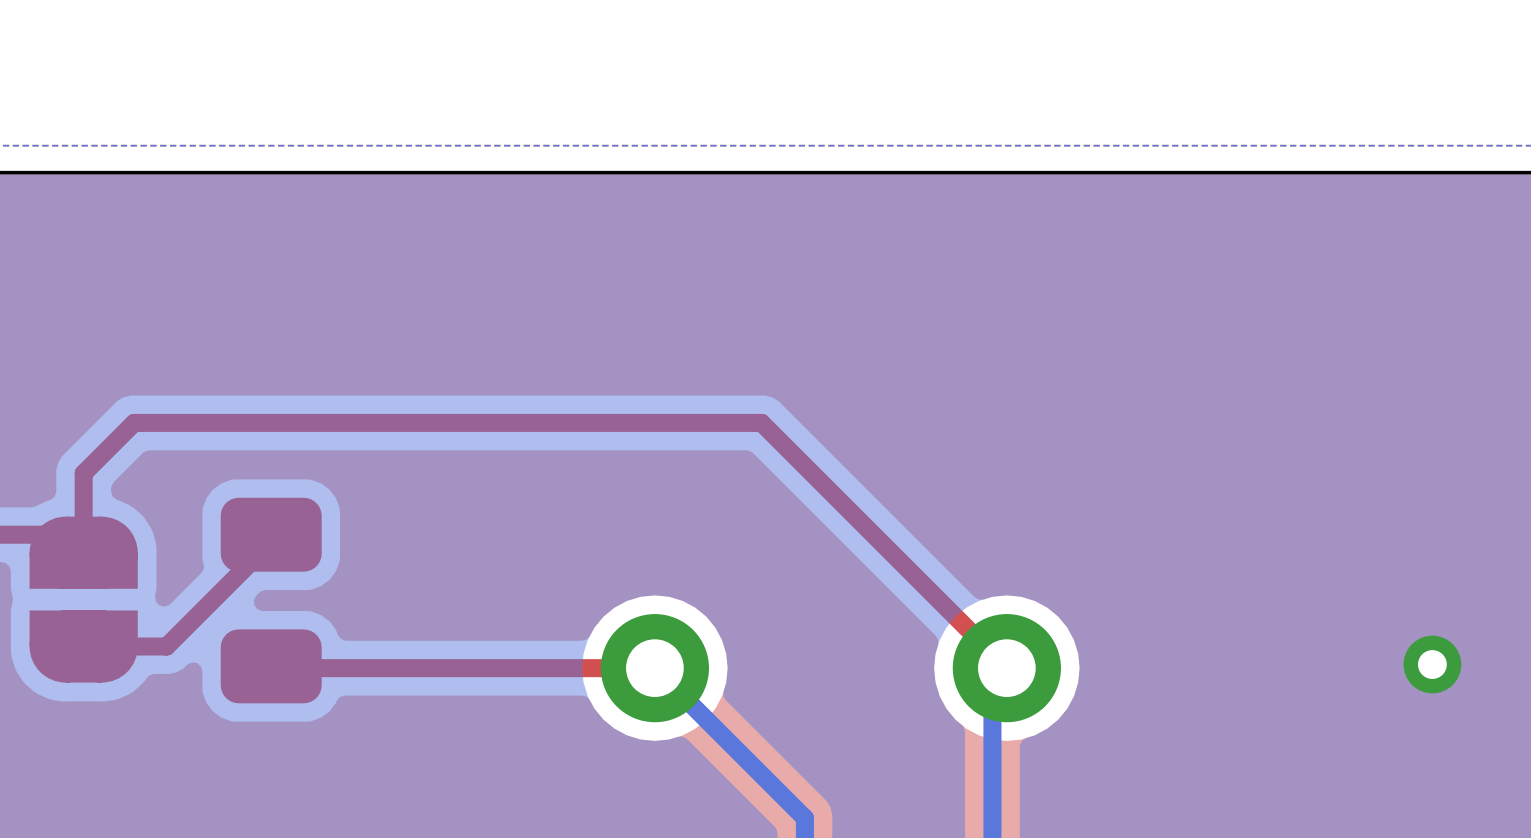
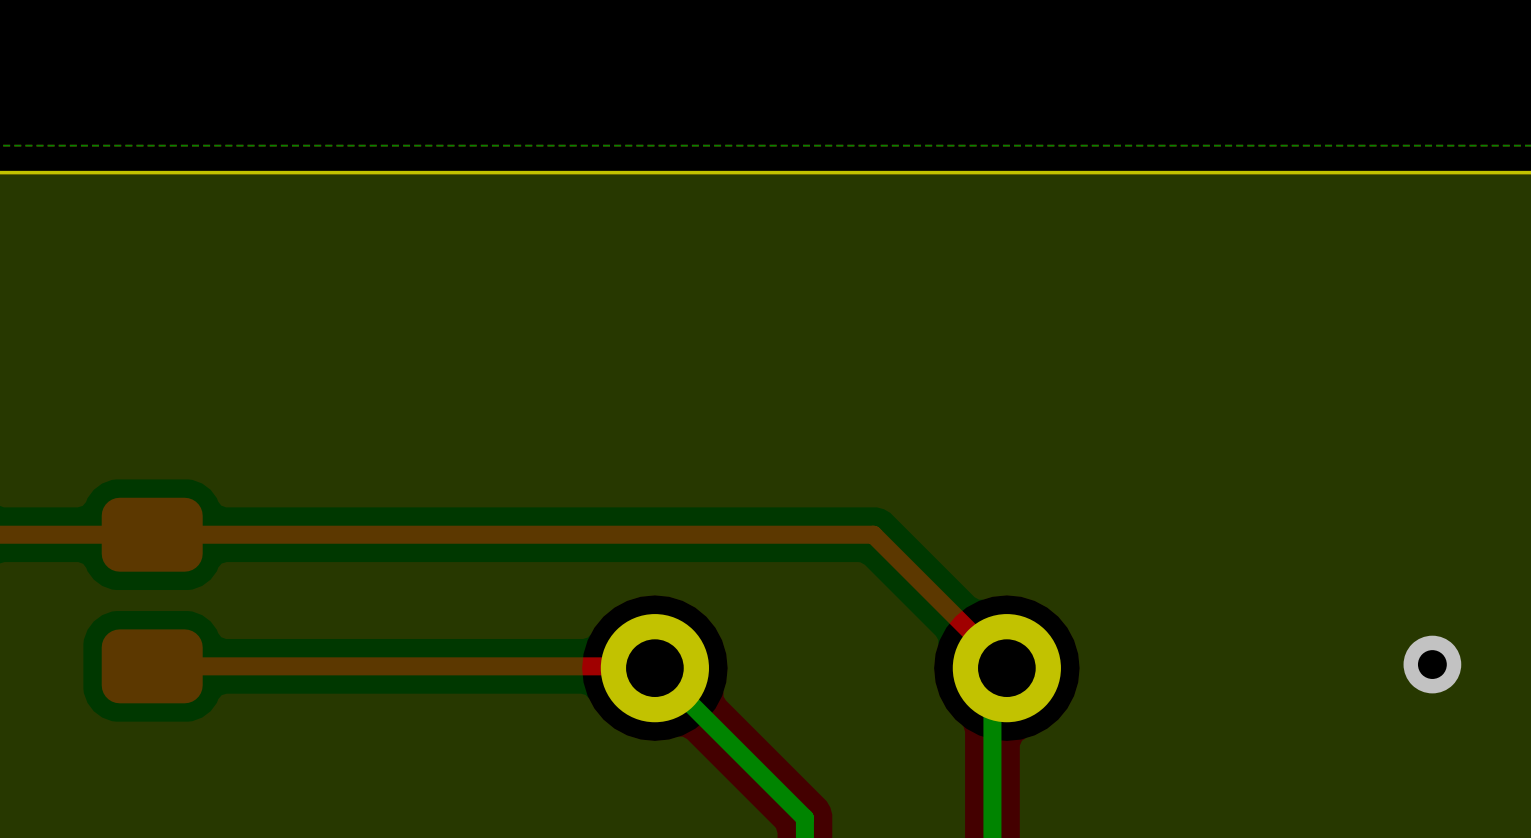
top track: (271, 534) (271, 541) (166, 646) (83, 646) -> none
top track: (873, 534) (761, 422) (134, 422) (83, 473) (83, 552) (65, 534) -> (873, 534) (65, 534)
part: (83, 599) -> none
part position: (271, 600) -> (152, 600)
top track: (271, 666) (273, 668) (654, 668) -> (152, 666) (653, 666)

